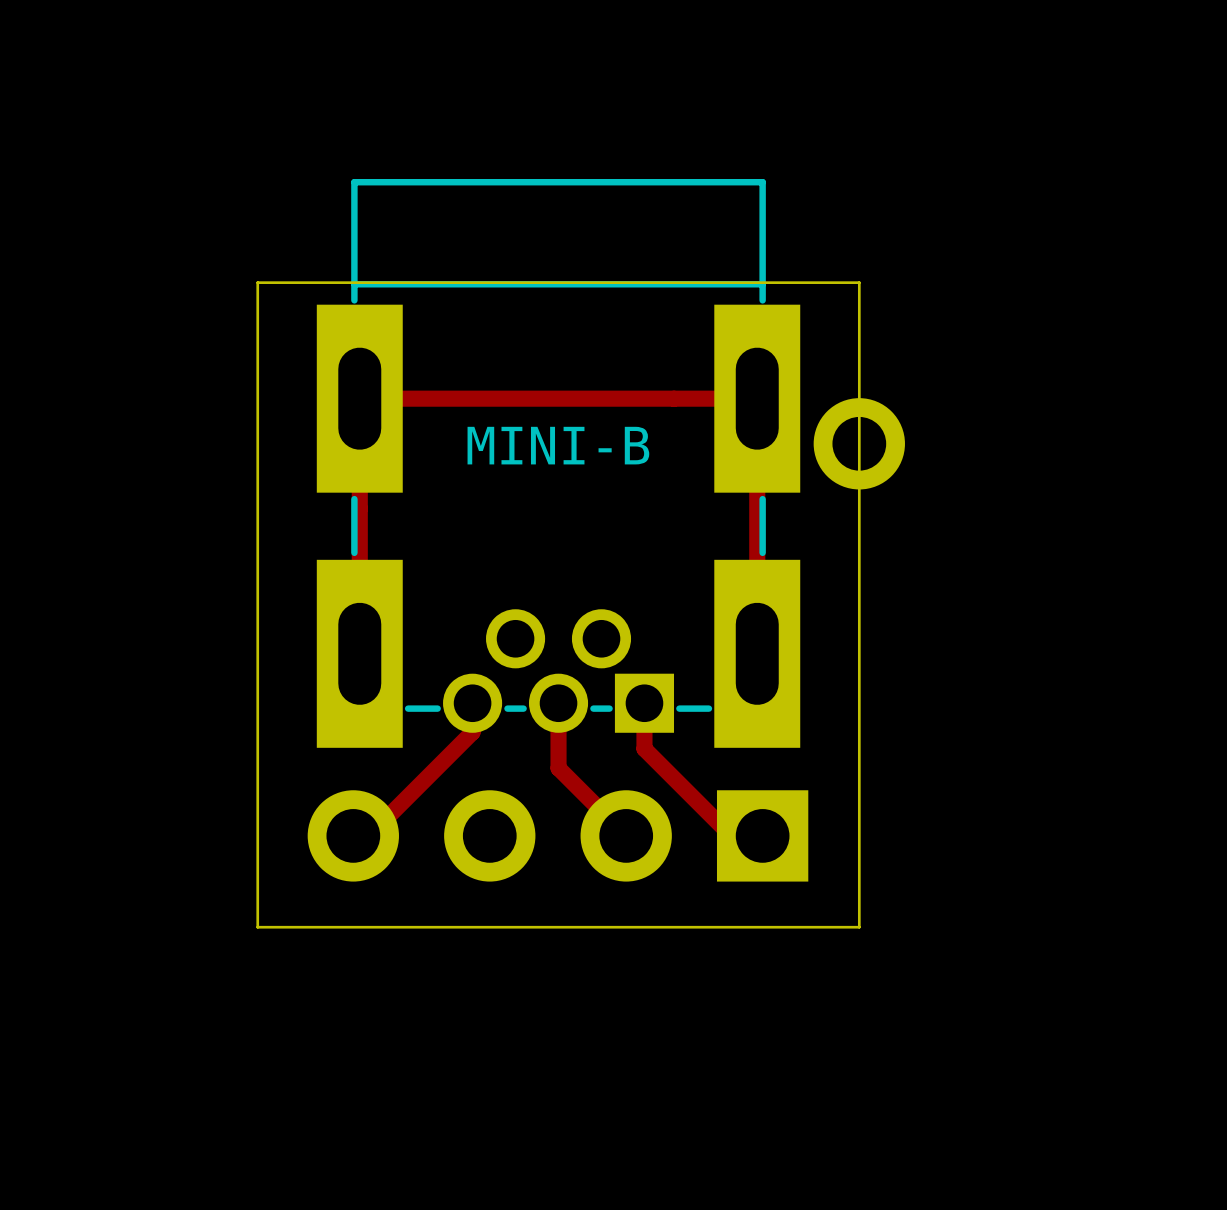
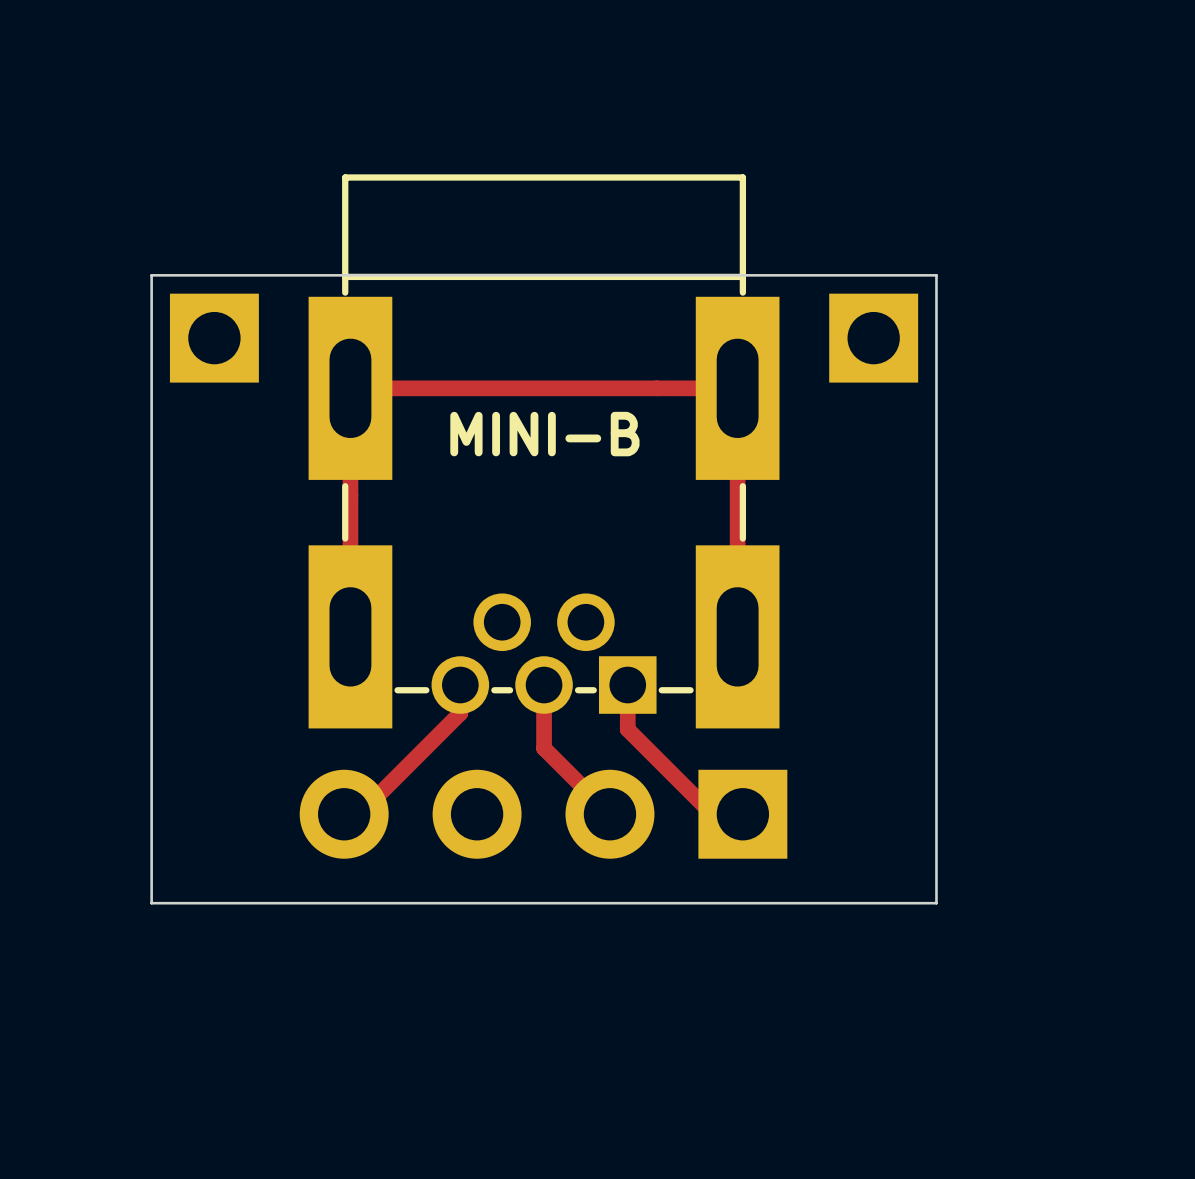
board edge: (257, 282) (257, 927) -> (251, 275) (151, 275) (151, 903) (251, 903)
board edge: (859, 282) (859, 927) -> (837, 275) (936, 275) (936, 903) (837, 903)
part: none -> (214, 338)
part: none -> (873, 338)
part: (859, 443) -> none

